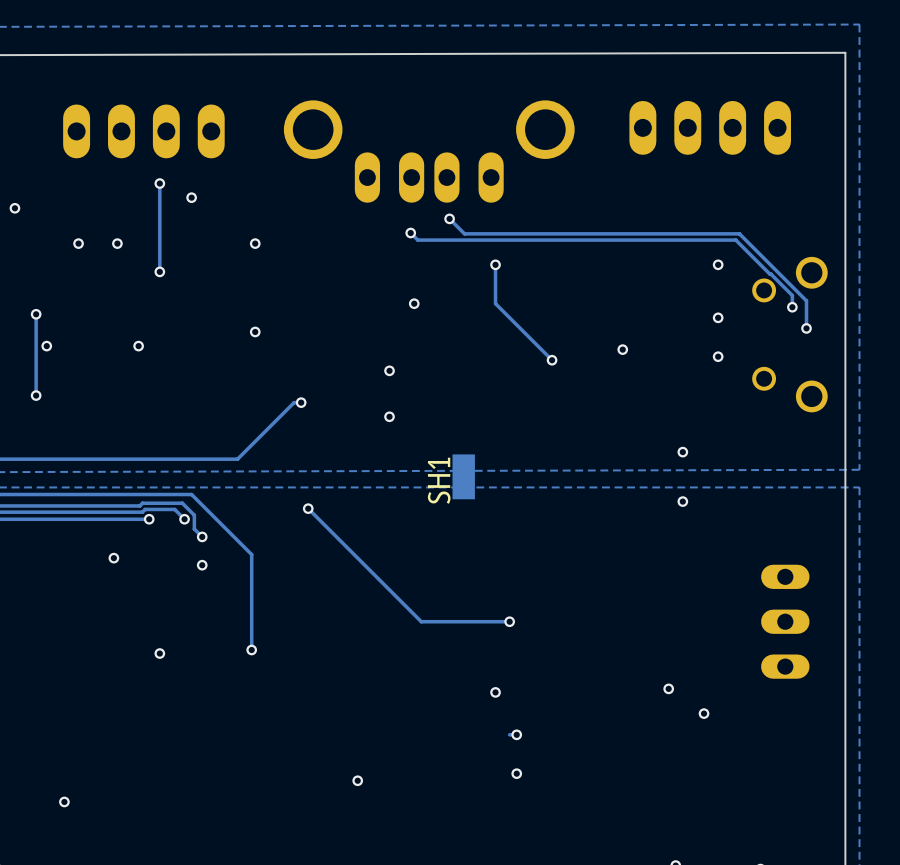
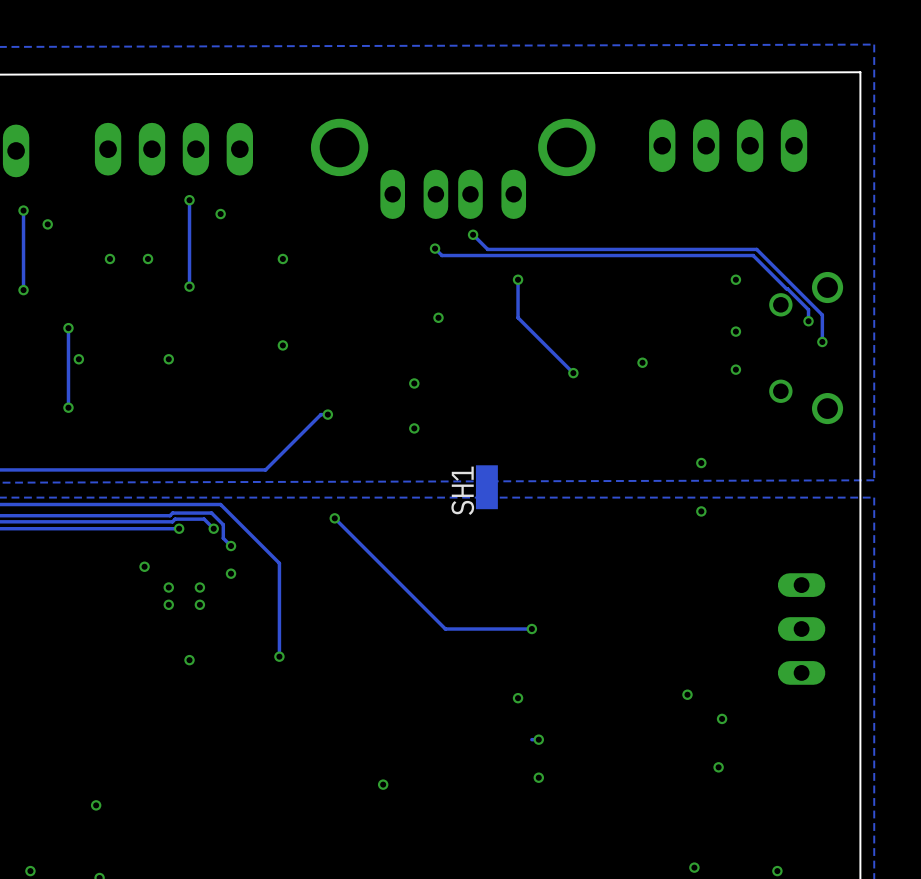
via: none -> (168, 587)
via: none -> (199, 587)
via: none -> (168, 604)
via: none -> (199, 604)
via: none -> (718, 767)

